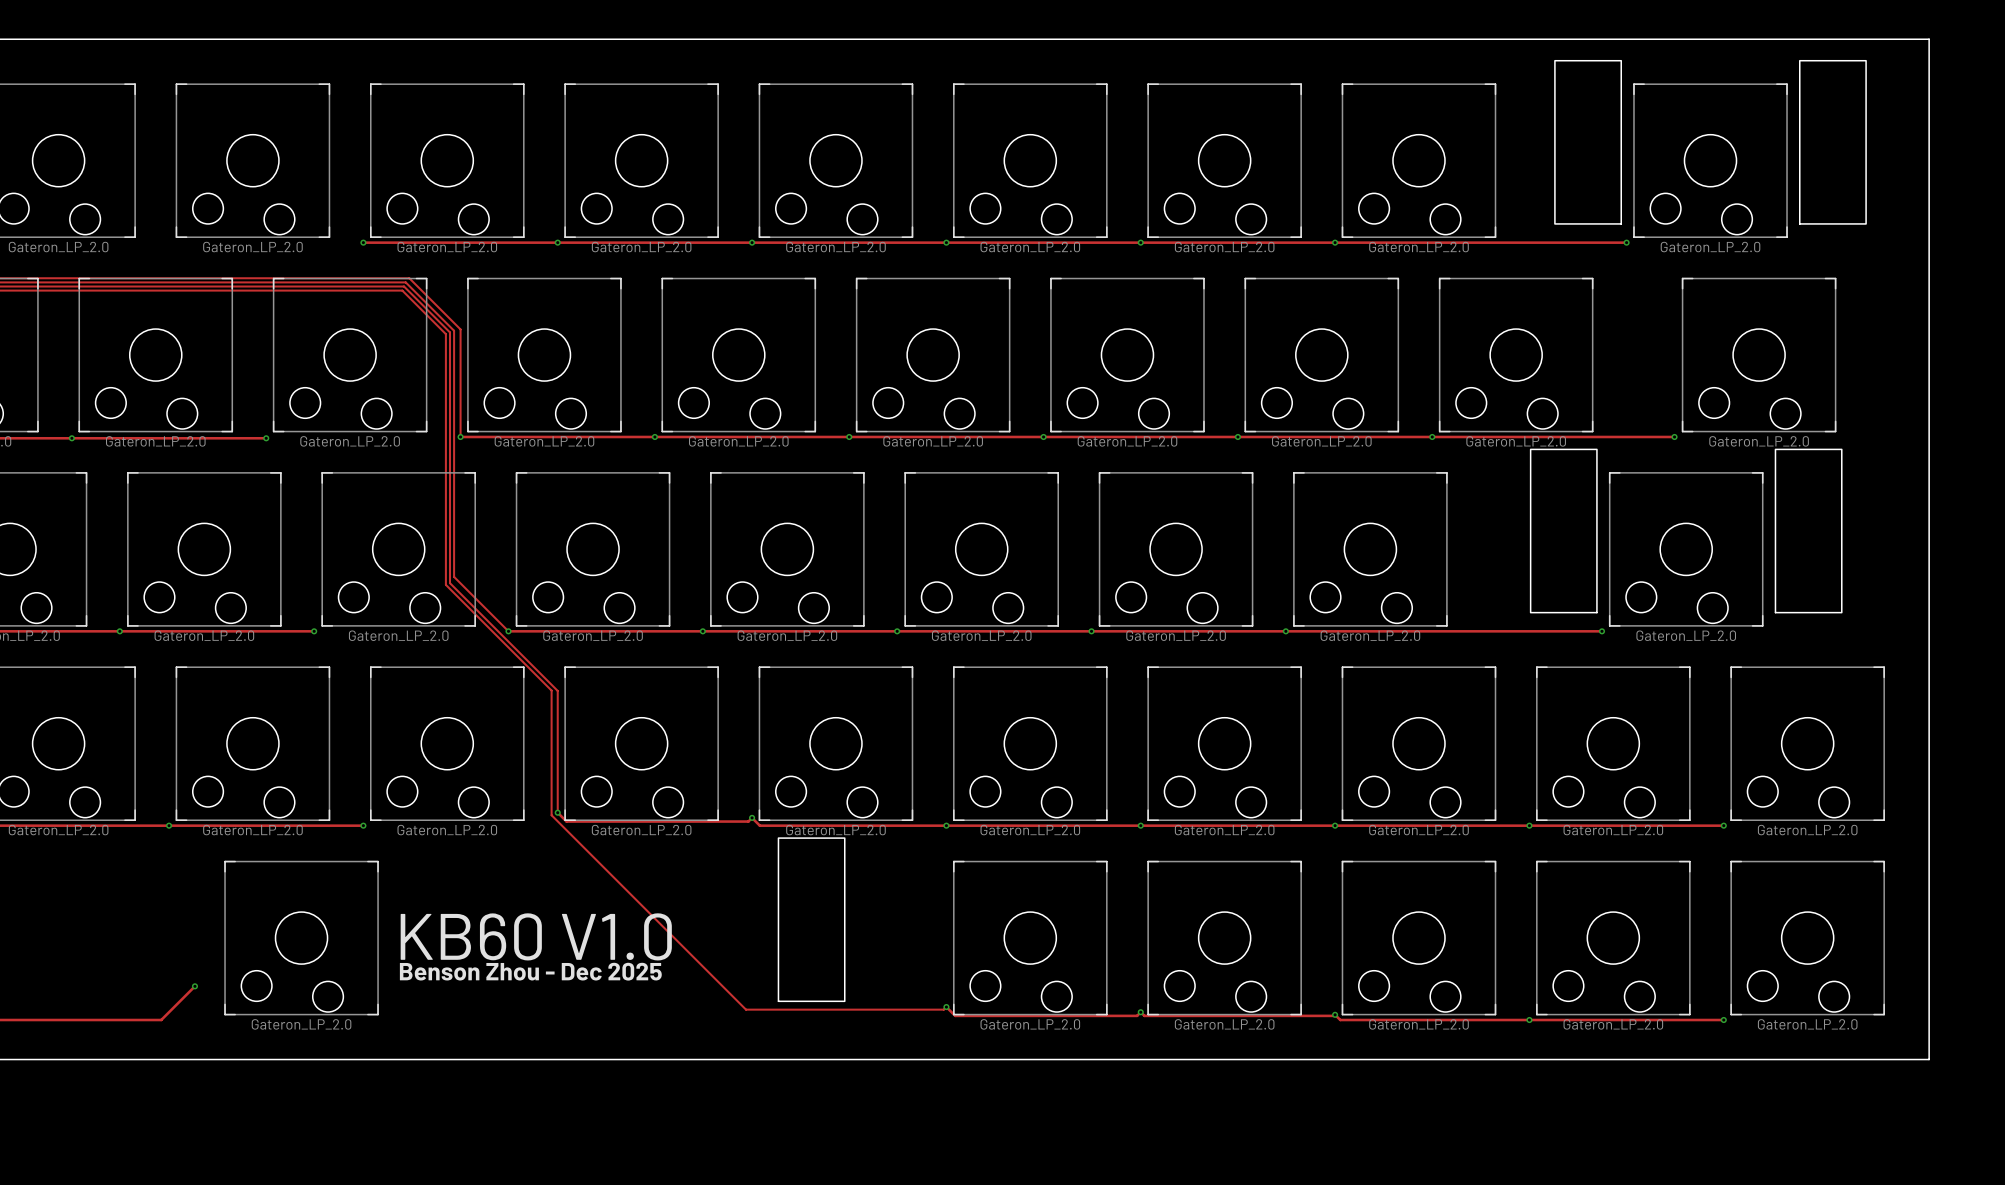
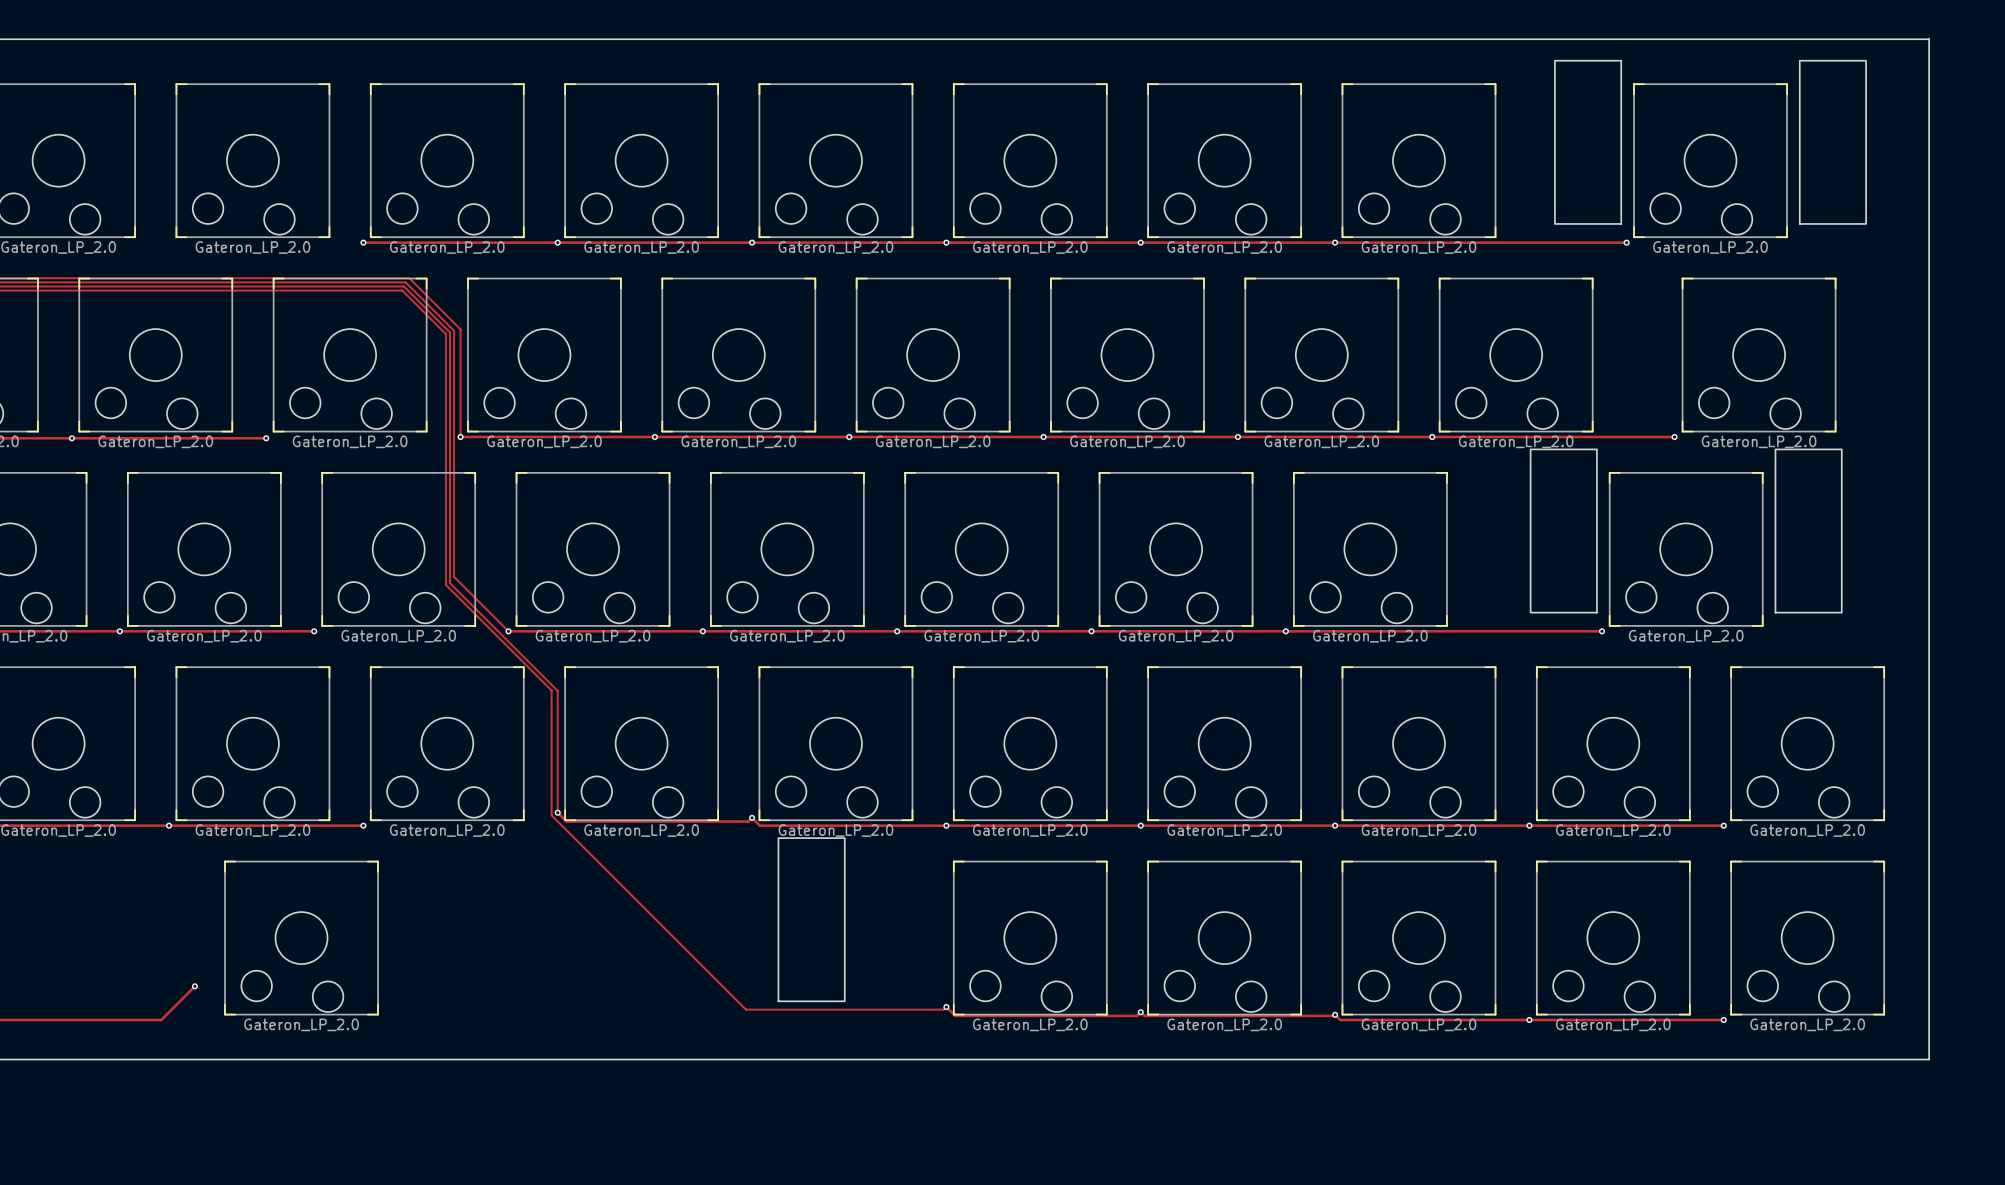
text: KB60 V1.0 (536, 936) -> none
text: Benson Zhou - Dec 2025 (530, 971) -> none

